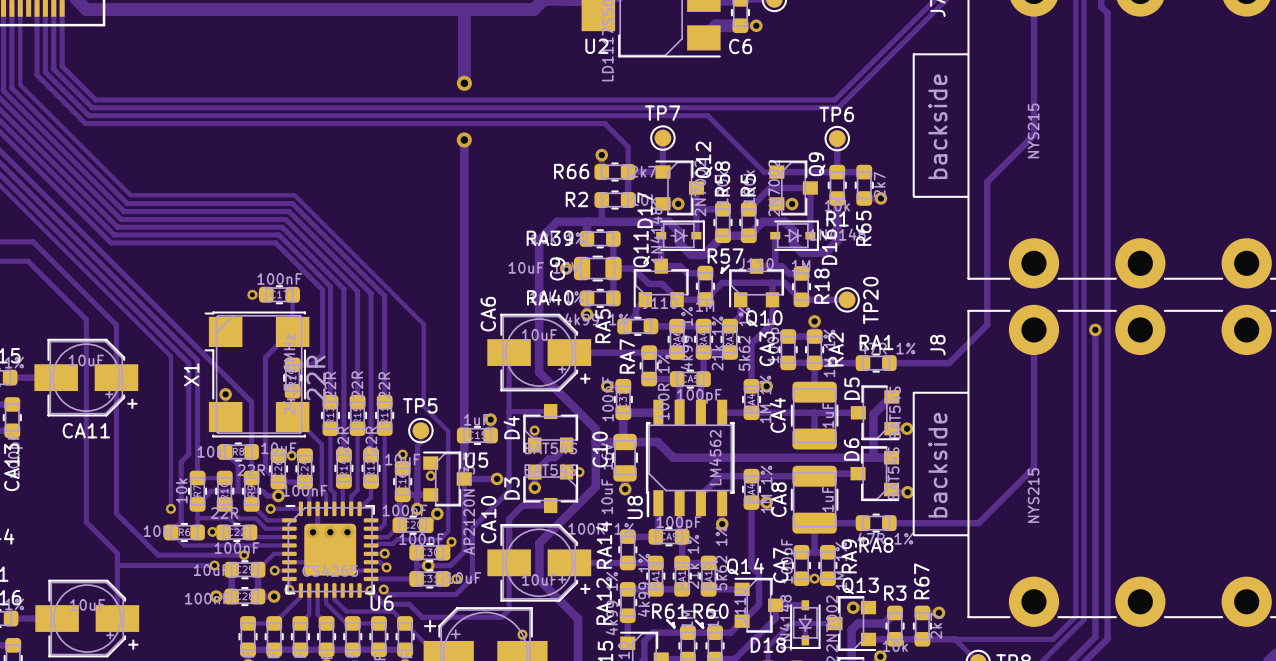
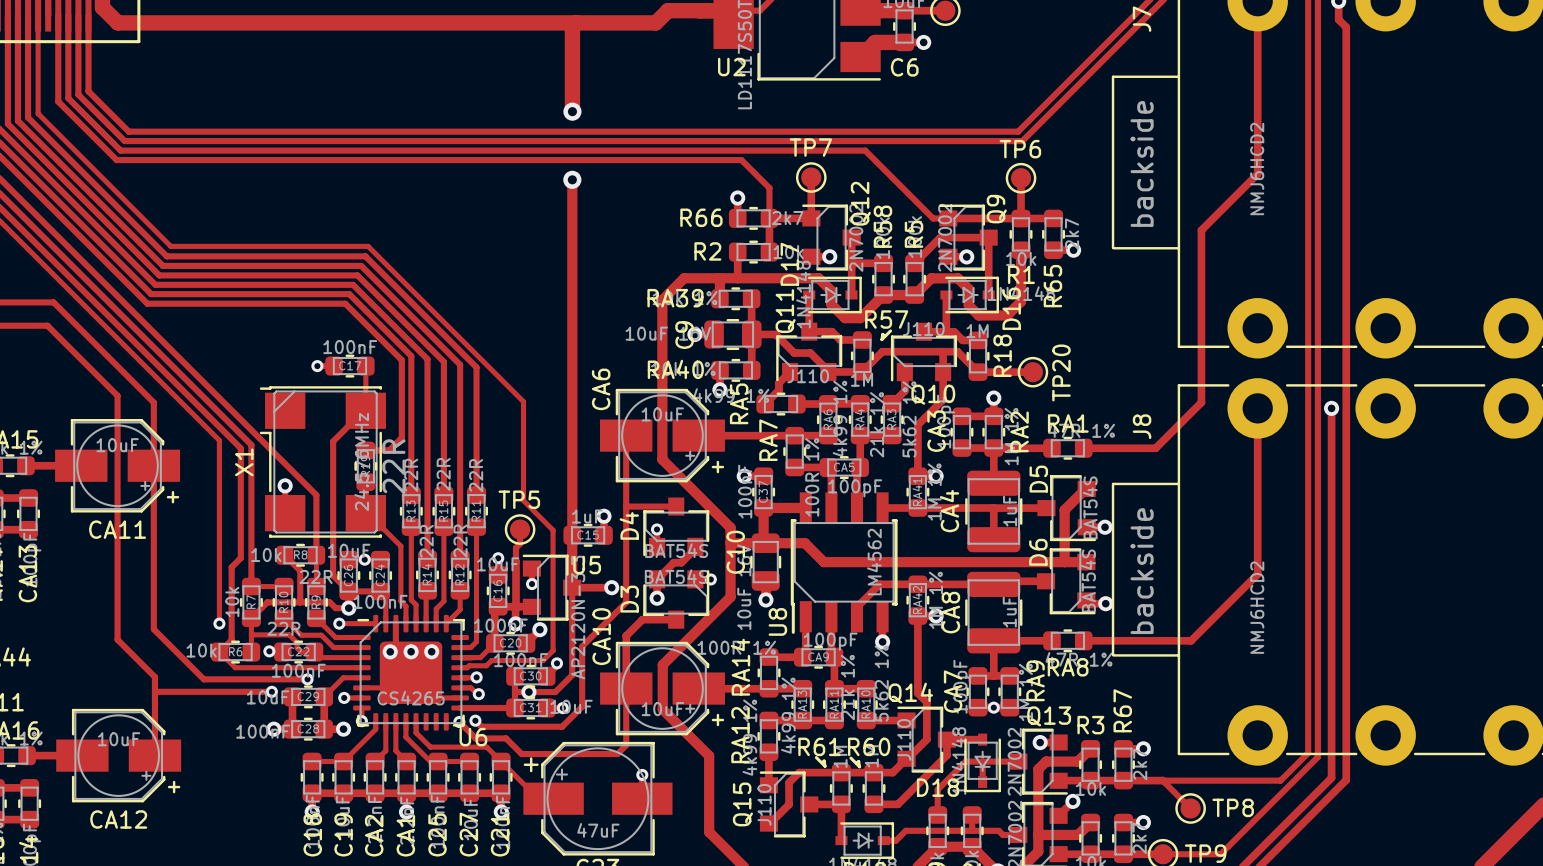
J7 value: NYS215 (1033, 130) -> NMJ6HCD2 (1257, 169)
J8 value: NYS215 (1033, 495) -> NMJ6HCD2 (1257, 607)

